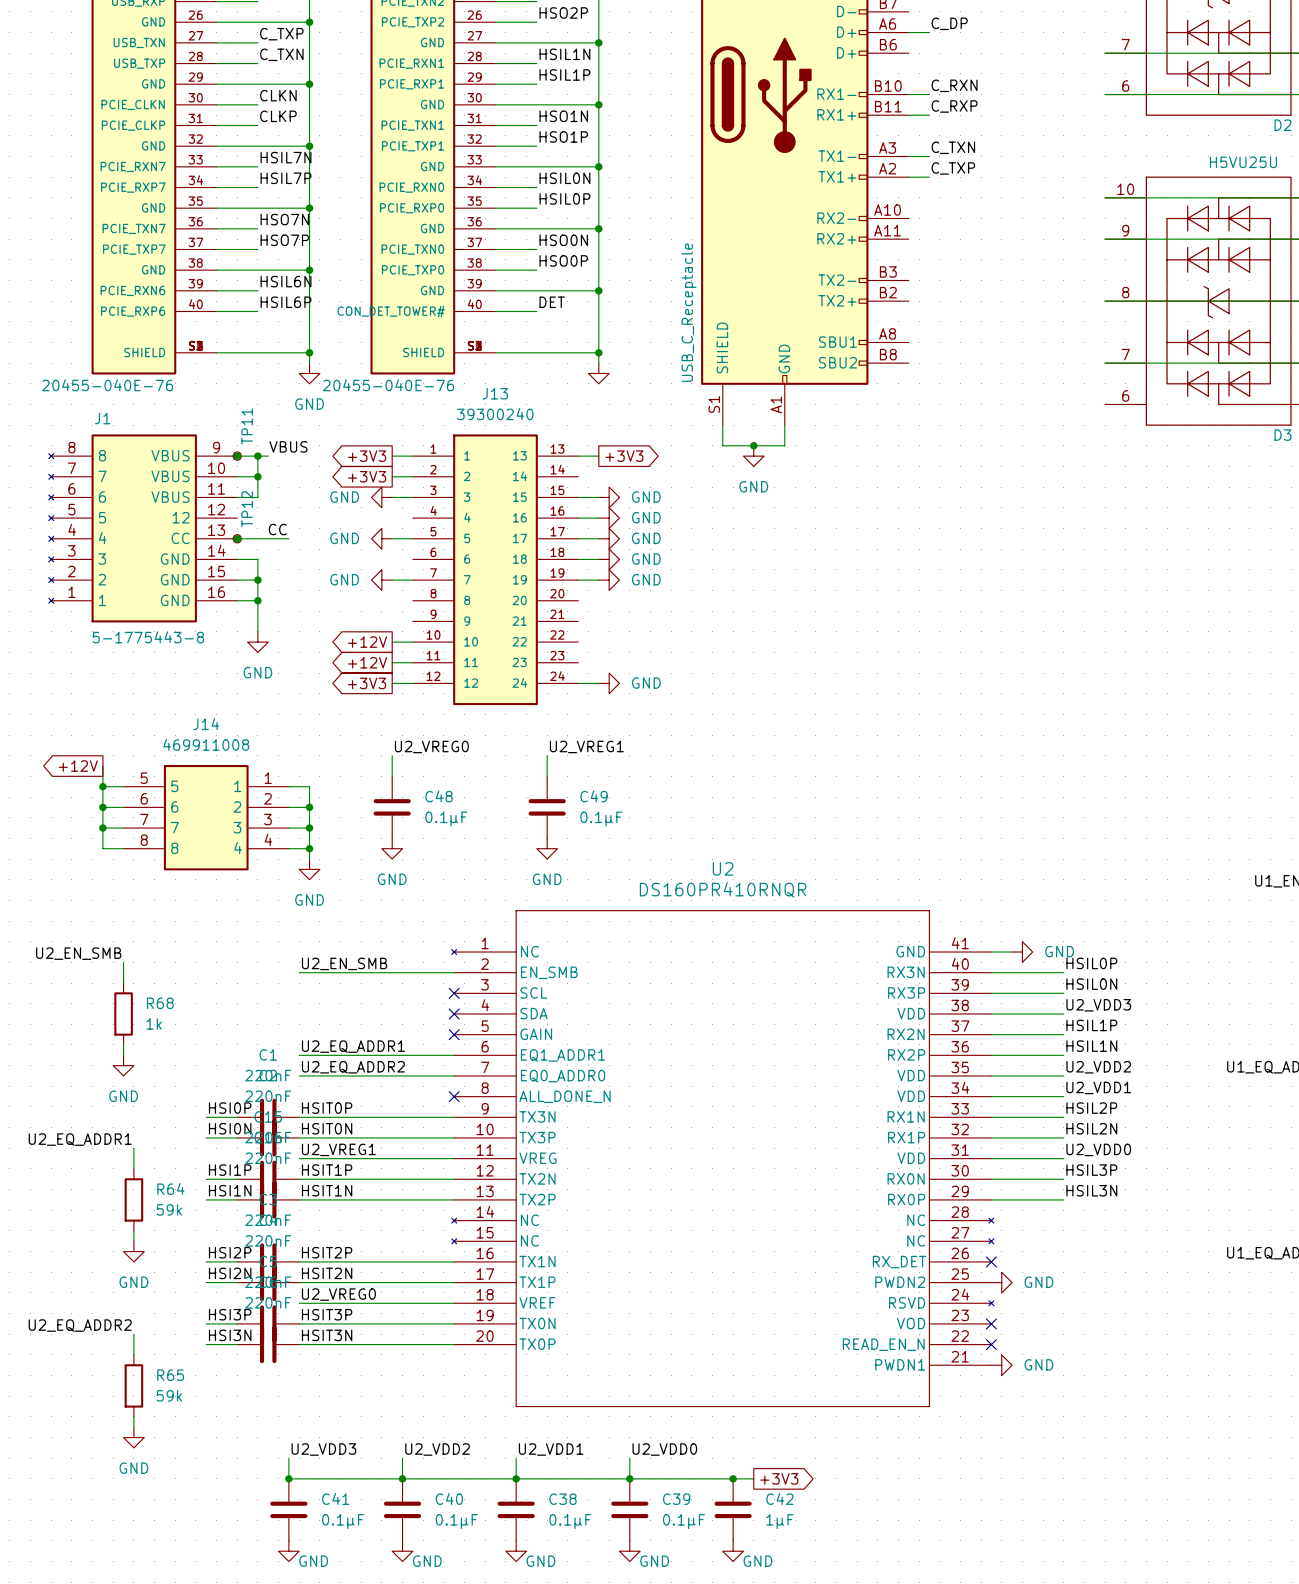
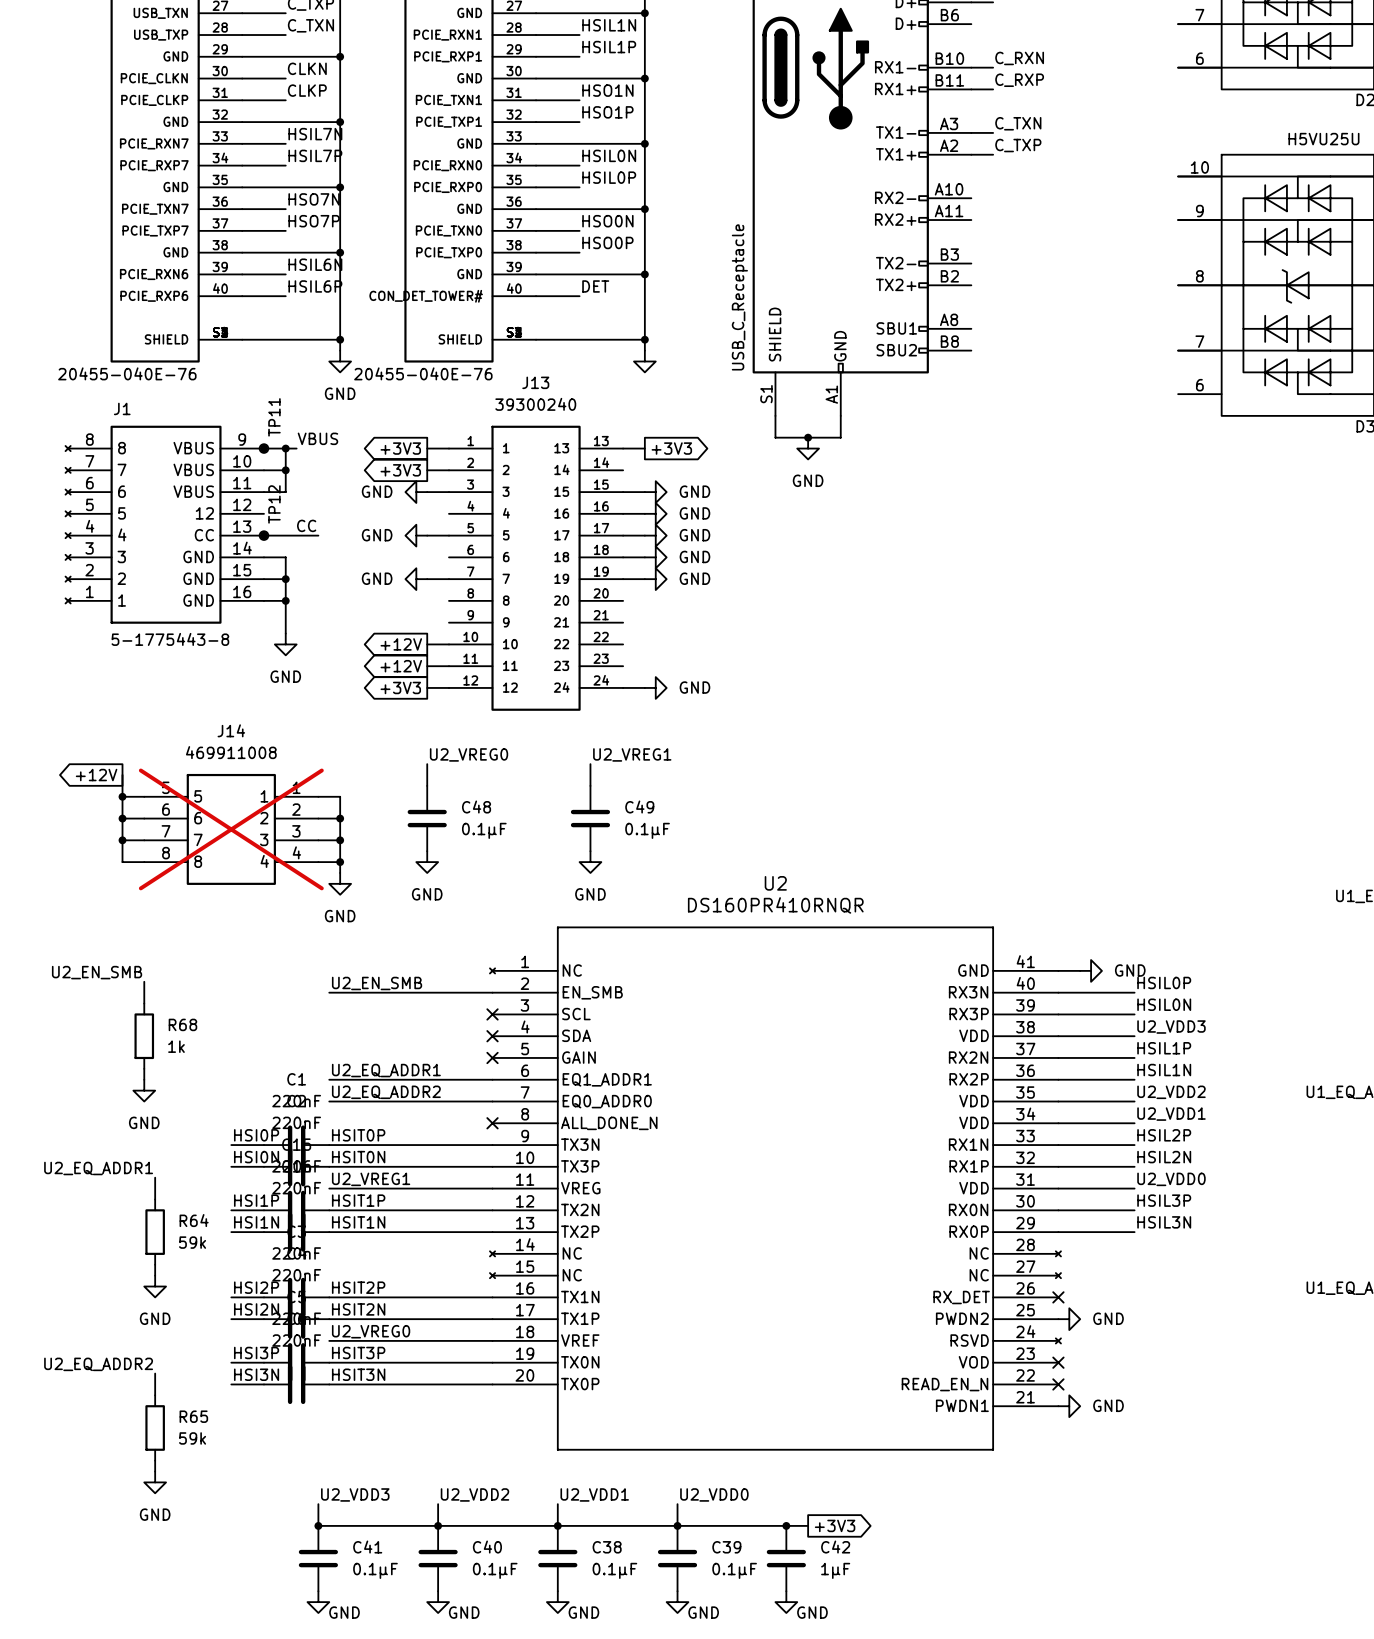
J14 do-not-place cross: none -> (231, 829)

